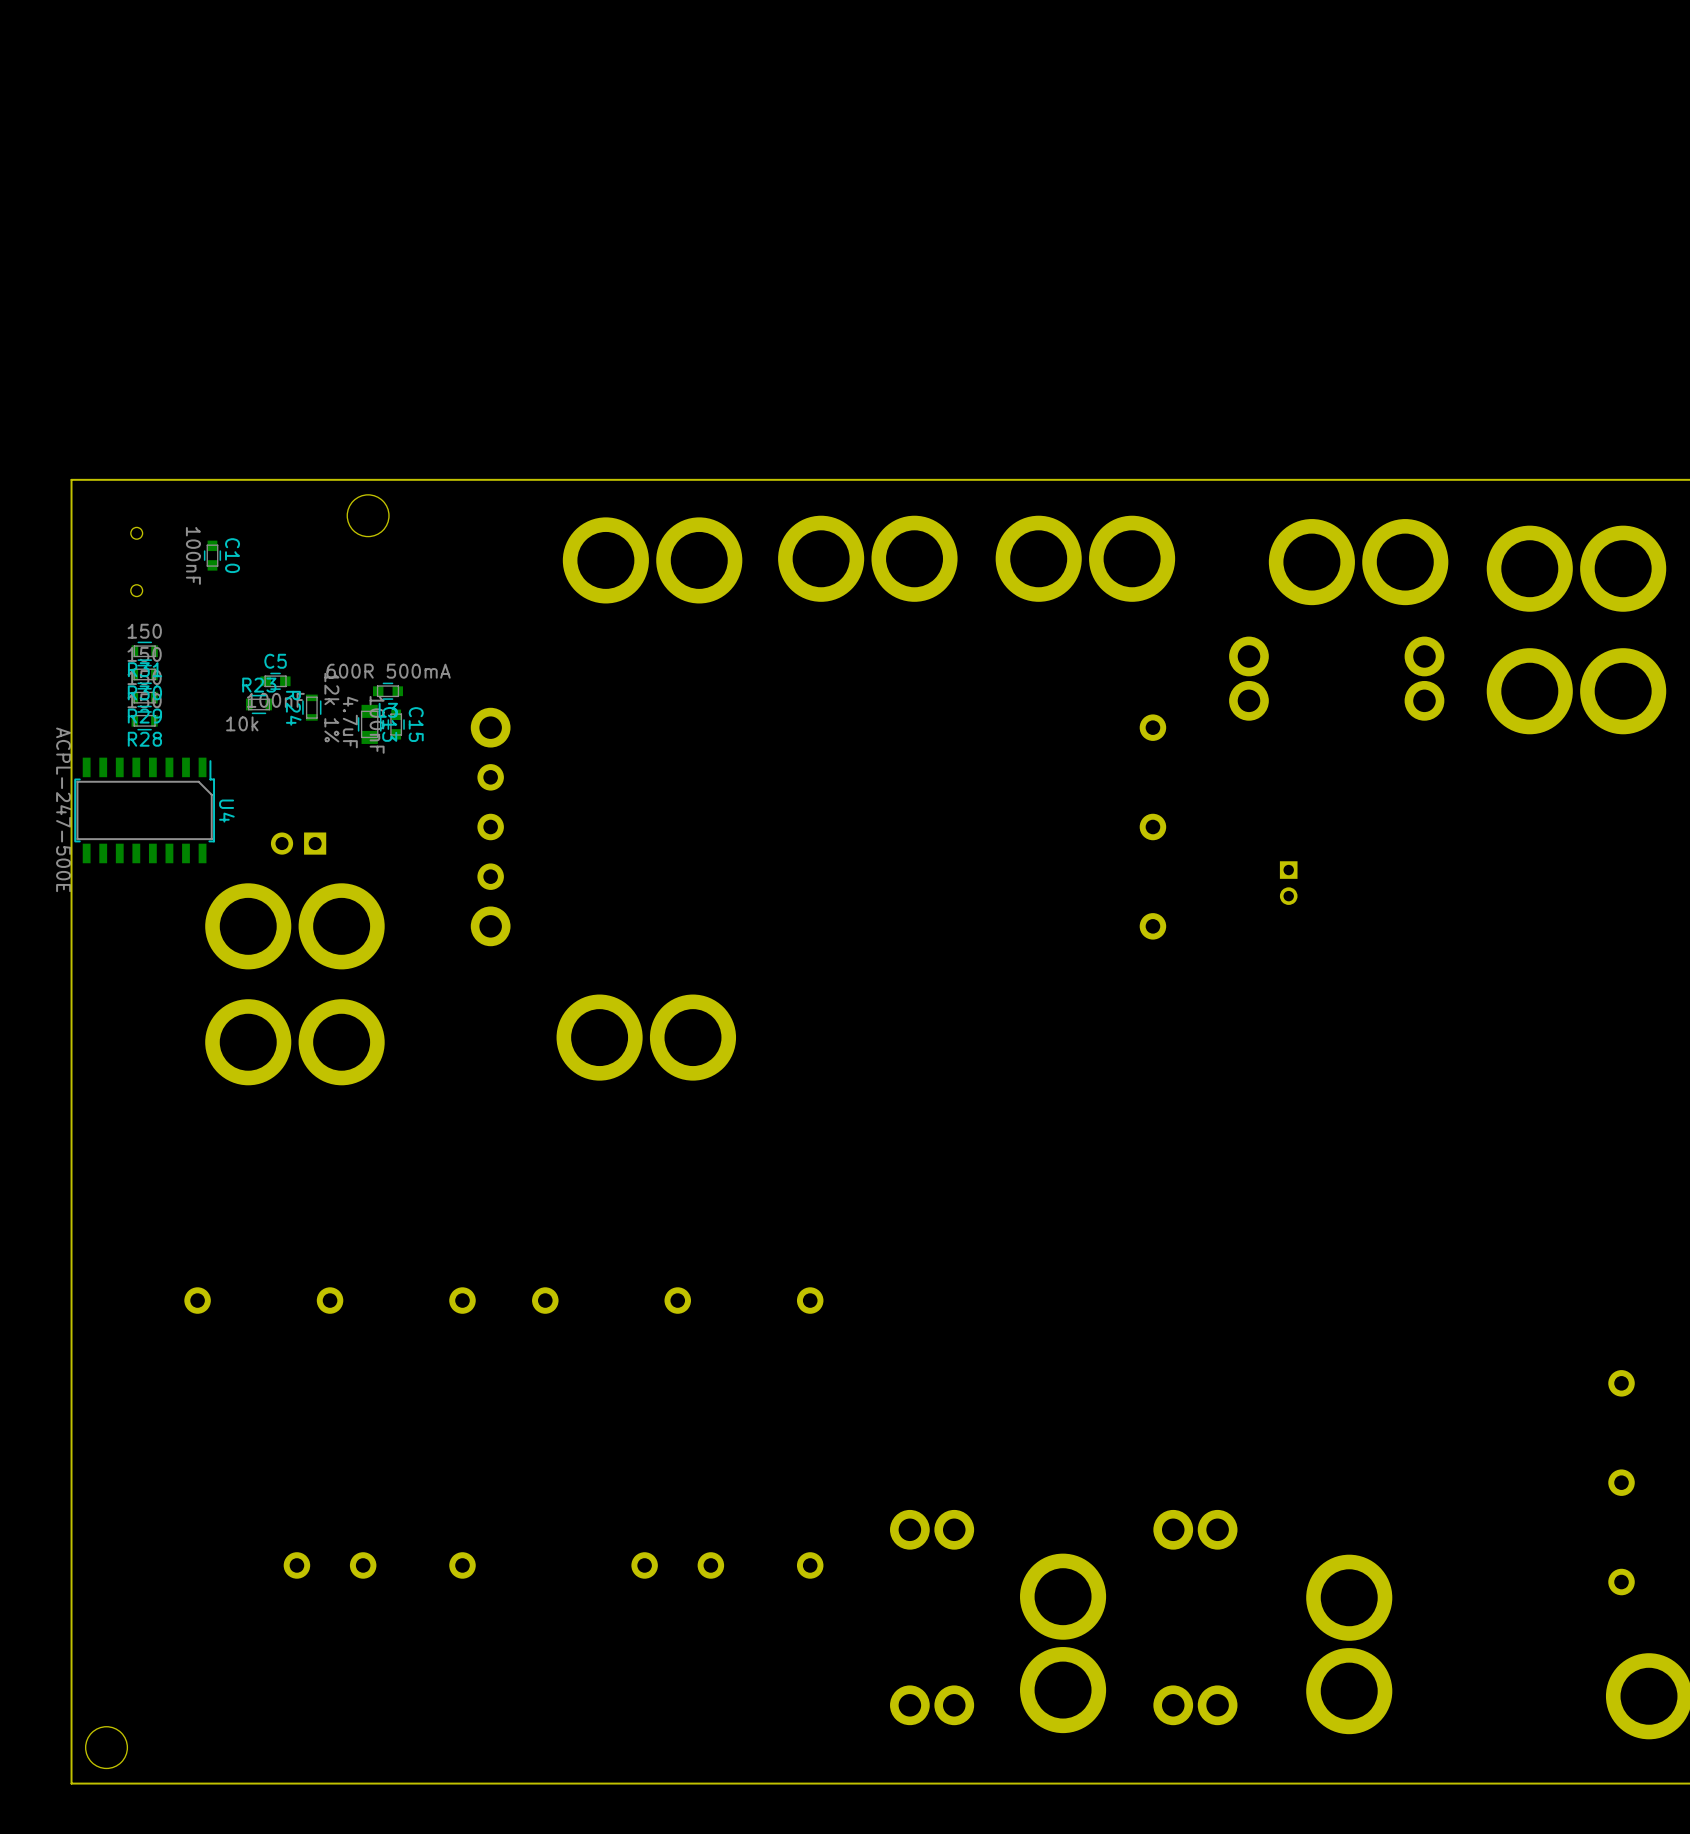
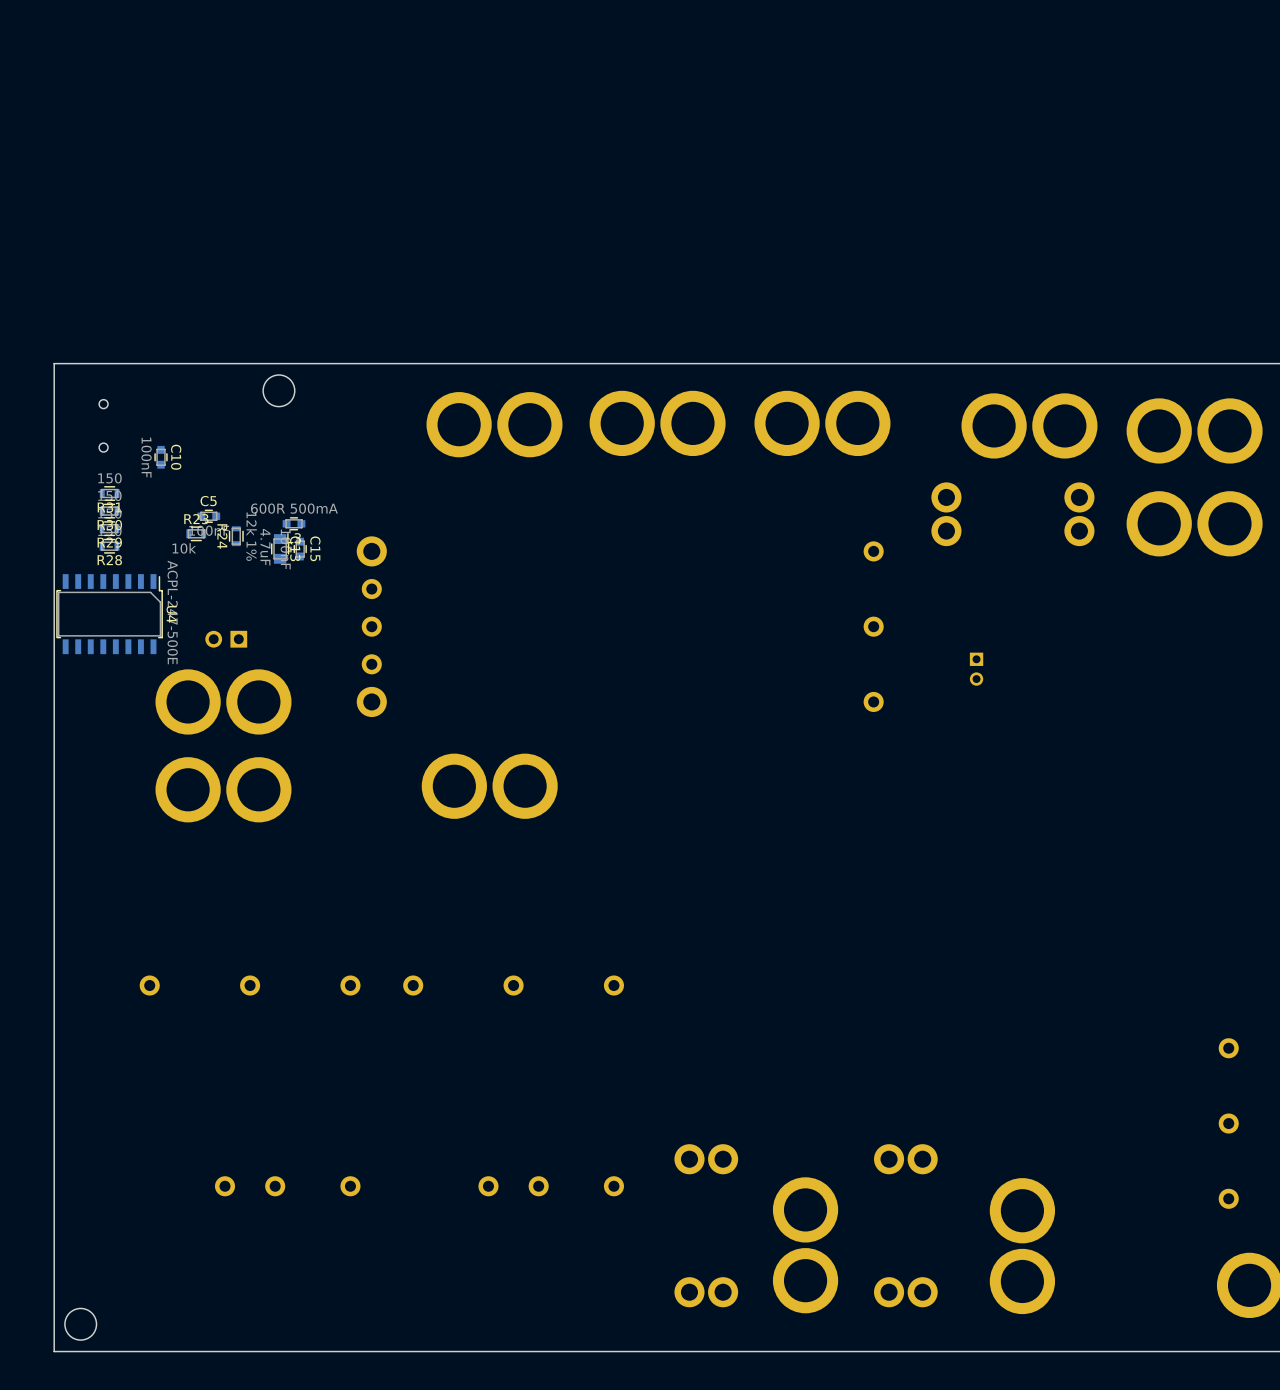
C10 position: (212, 555) -> (161, 457)
U4 value position: ACPL-247-500E (63, 809) -> ACPL-247-500E (172, 612)

